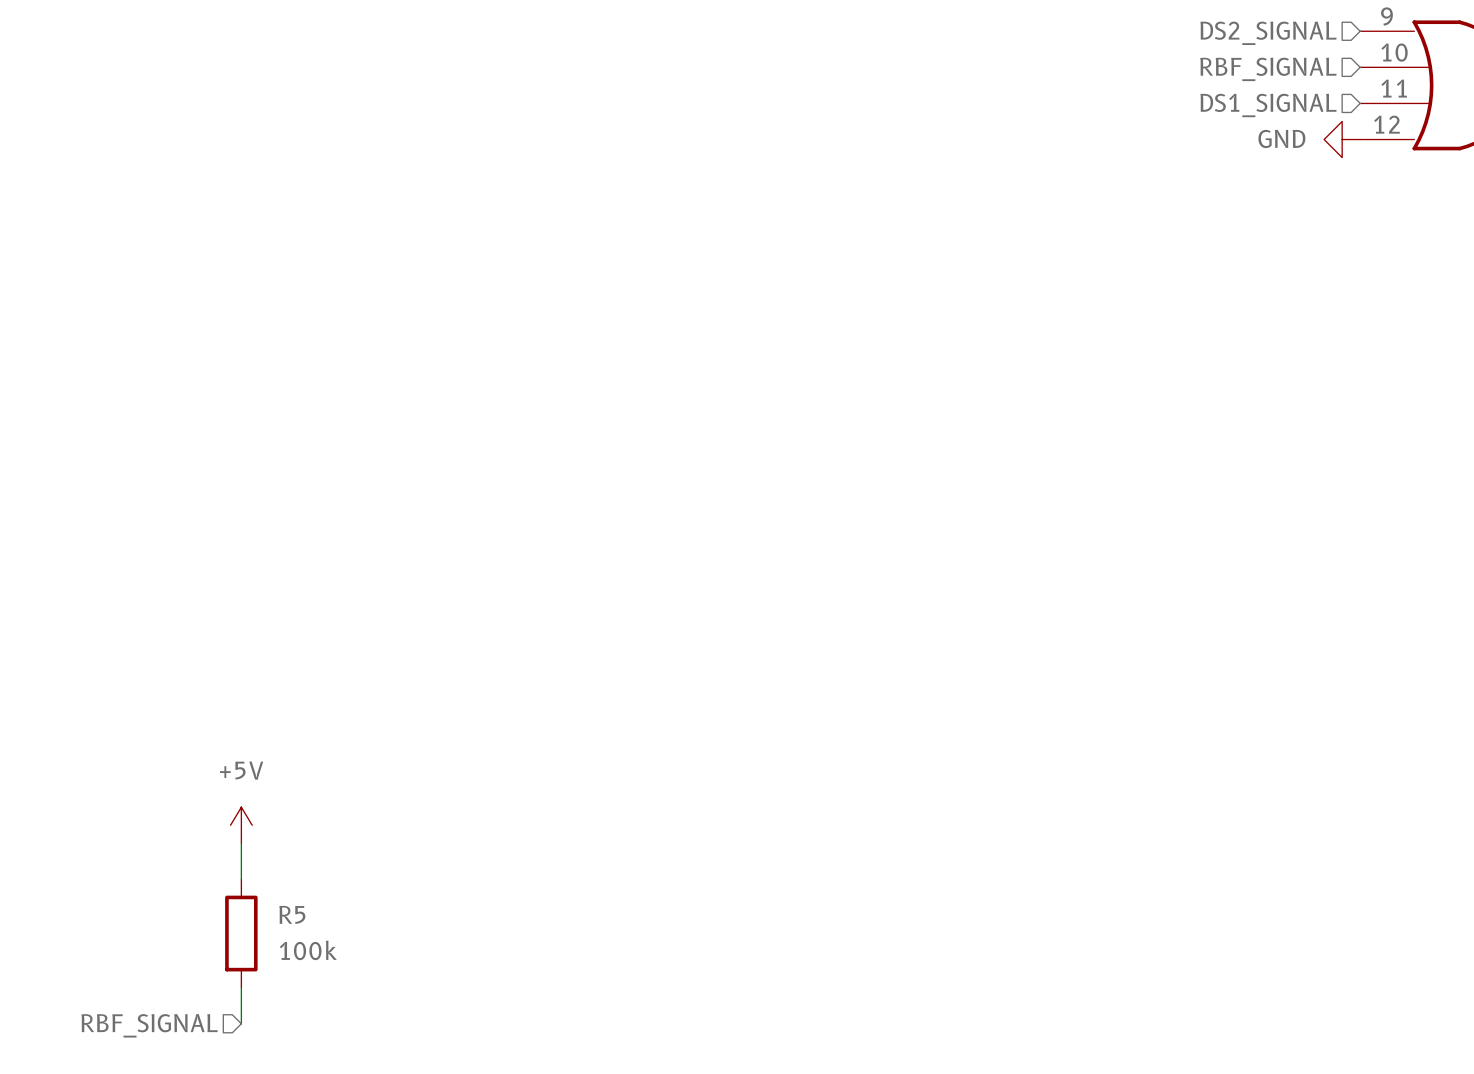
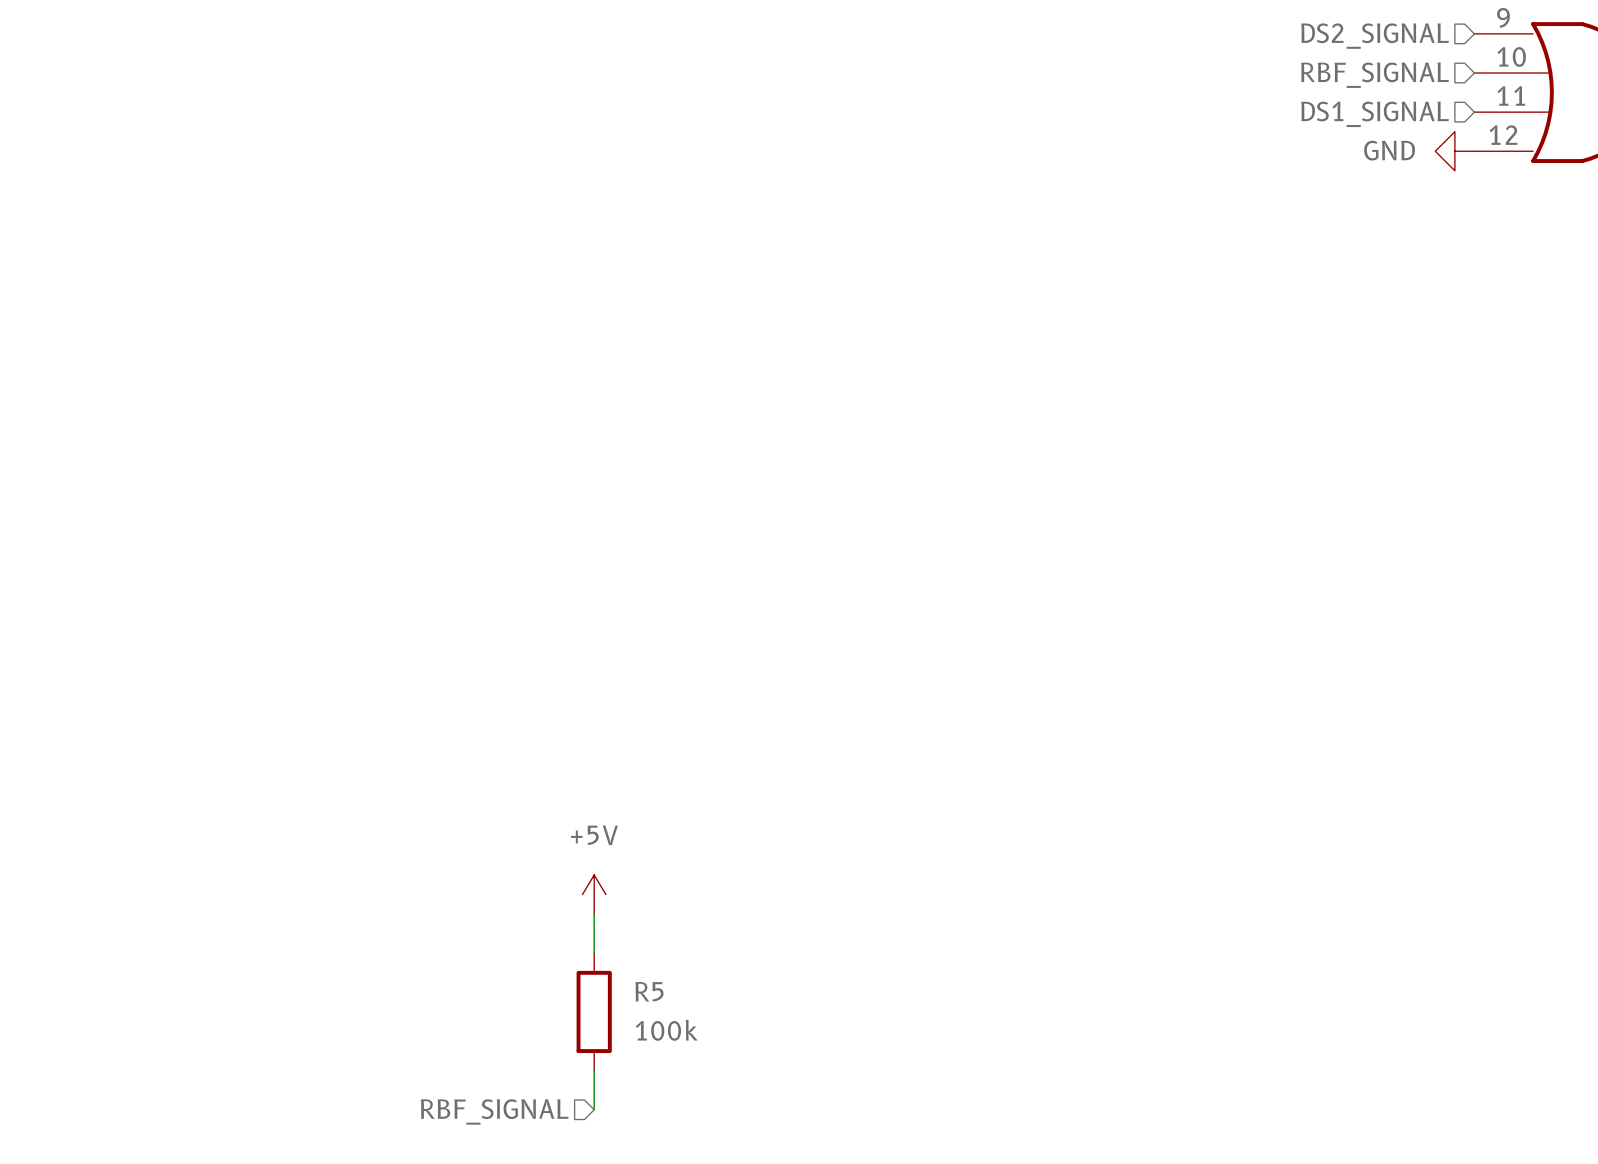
power symbol position: +5V (241, 825) -> +5V (594, 894)
wire: (241, 843) (241, 879) -> (594, 914) (594, 953)
R5 position: (241, 933) -> (594, 1011)
wire: (241, 987) (241, 1023) -> (594, 1070) (594, 1109)
hierarchical label position: RBF_SIGNAL (149, 1025) -> RBF_SIGNAL (494, 1111)

